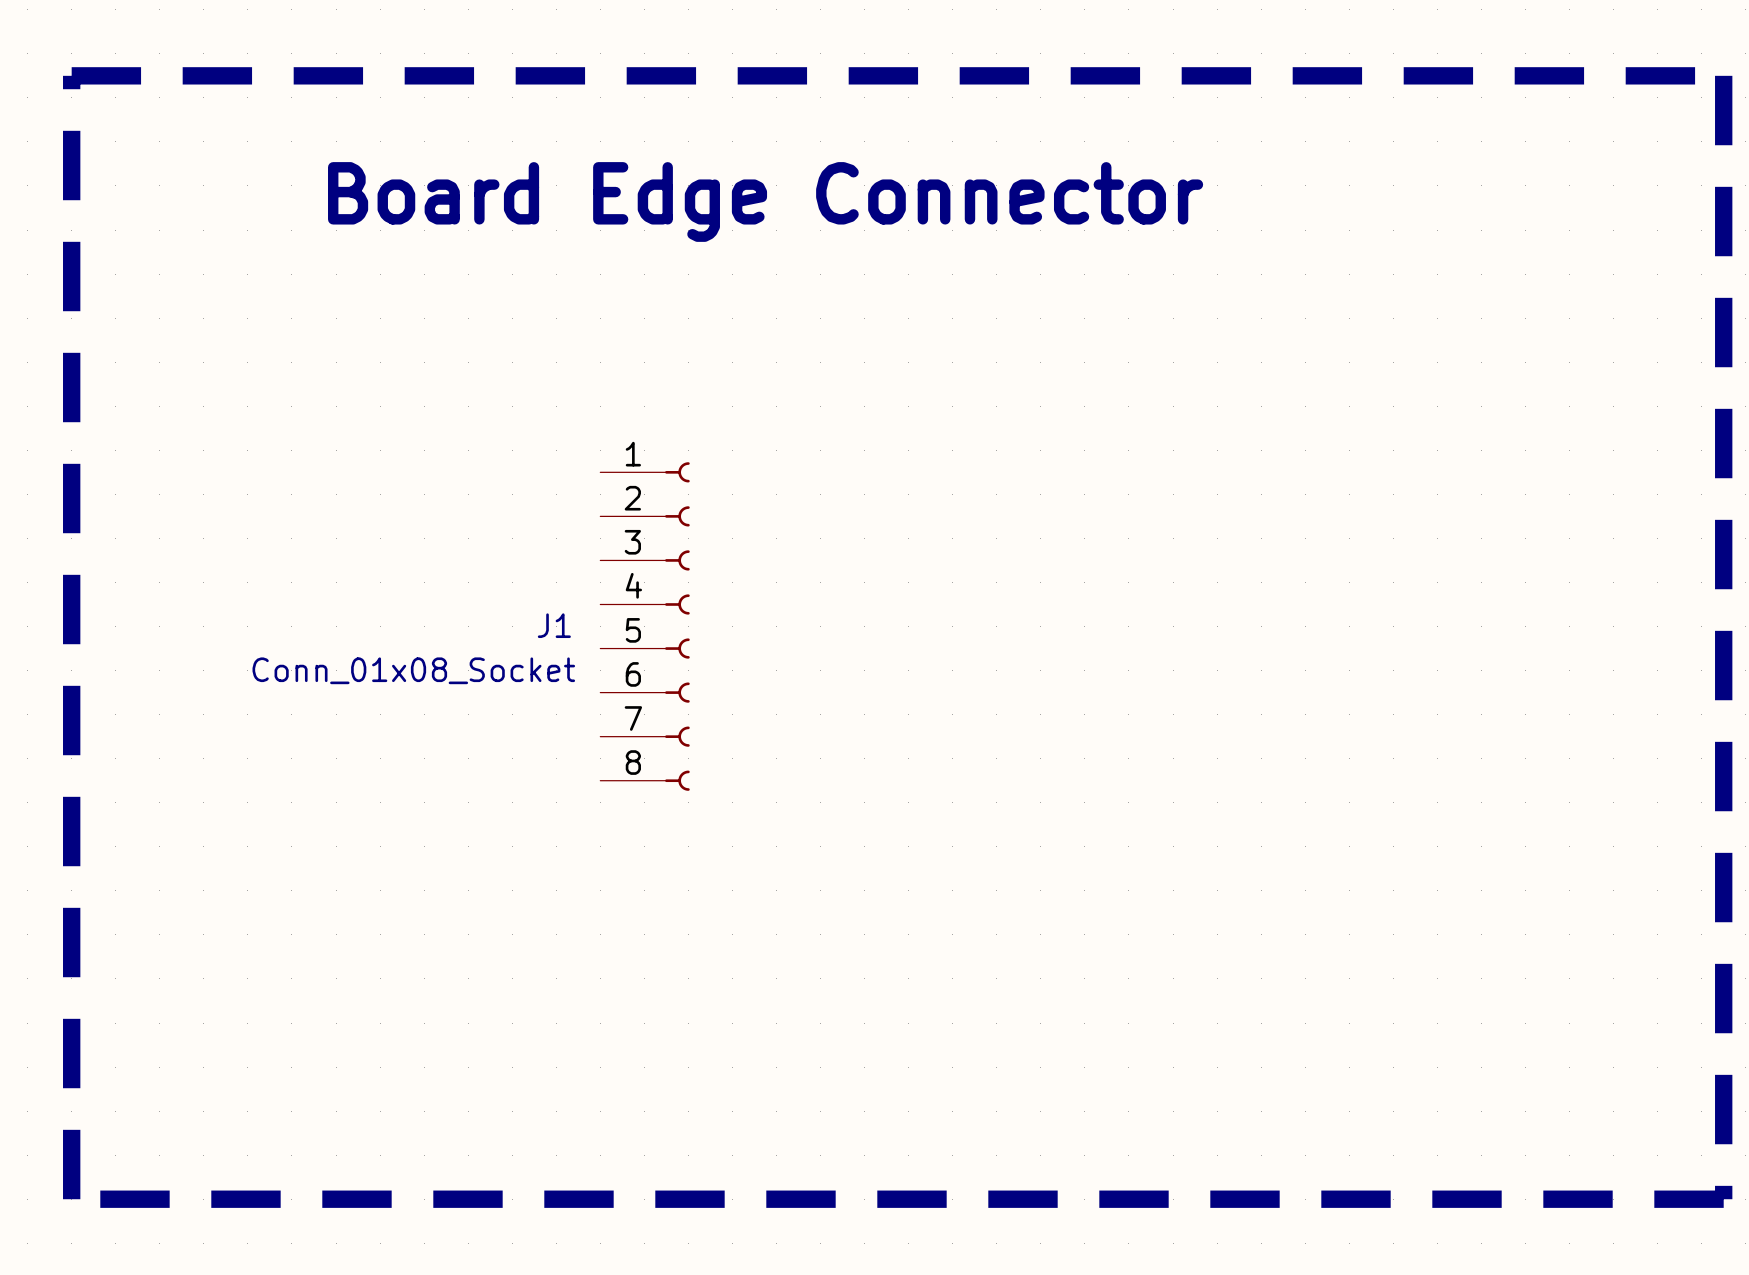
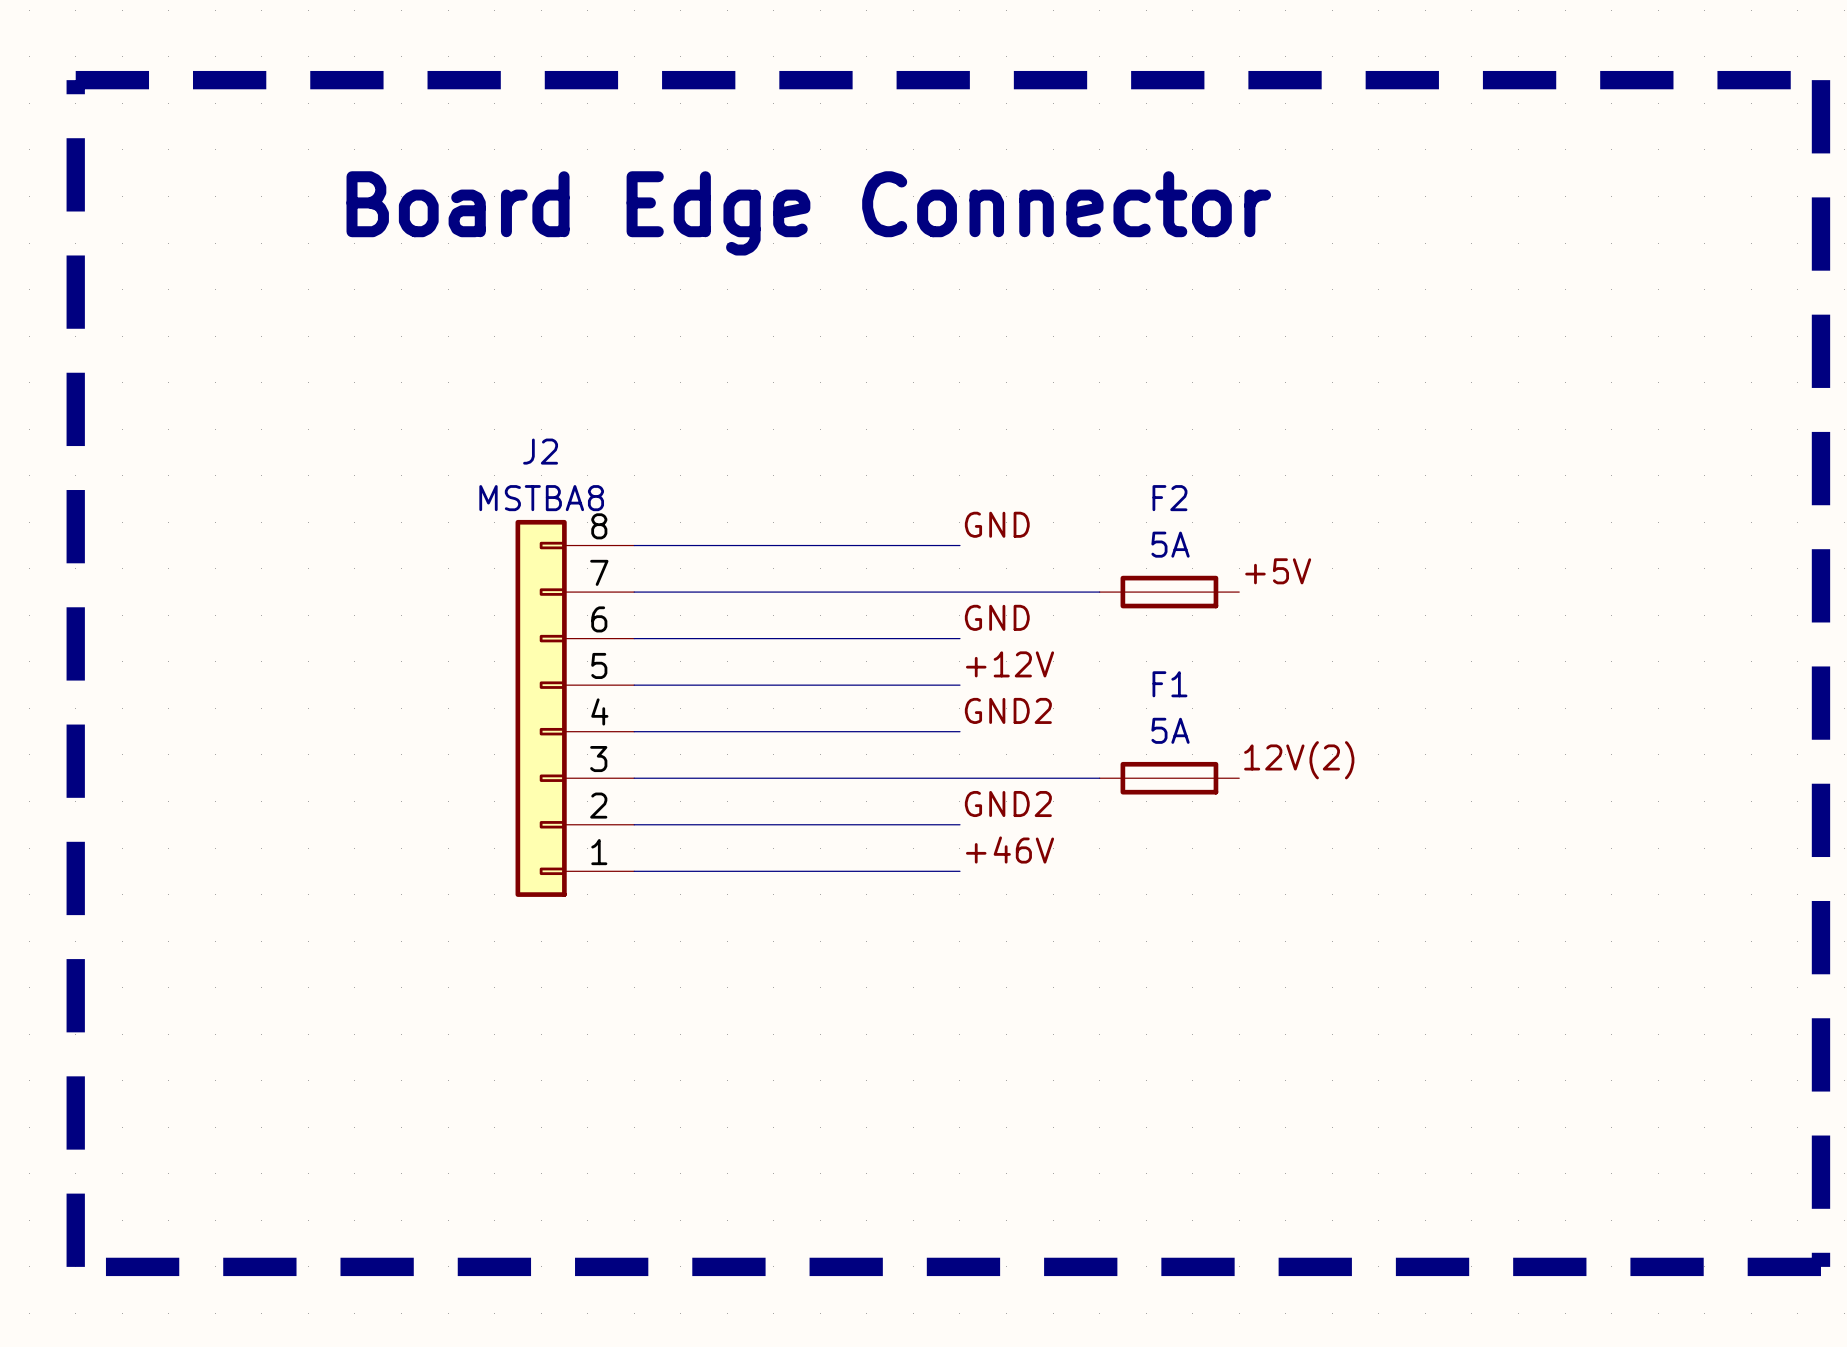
label: none -> GND (997, 524)
wire: none -> (634, 545) (959, 545)
label: none -> +5V (1278, 571)
wire: none -> (634, 592) (1099, 592)
F2: none -> 5A (1169, 592)
label: none -> GND (997, 617)
wire: none -> (634, 638) (959, 638)
J1: Conn_01x08_Socket (645, 626) -> none
label: none -> +12V (1010, 664)
wire: none -> (634, 685) (959, 685)
J2: none -> MSTBA8 (574, 708)
label: none -> GND2 (1008, 710)
wire: none -> (634, 731) (959, 731)
label: none -> 12V(2) (1299, 760)
wire: none -> (634, 778) (1099, 778)
F1: none -> 5A (1169, 778)
label: none -> GND2 (1008, 804)
wire: none -> (634, 824) (959, 824)
label: none -> +46V (1010, 849)
wire: none -> (634, 871) (959, 871)

